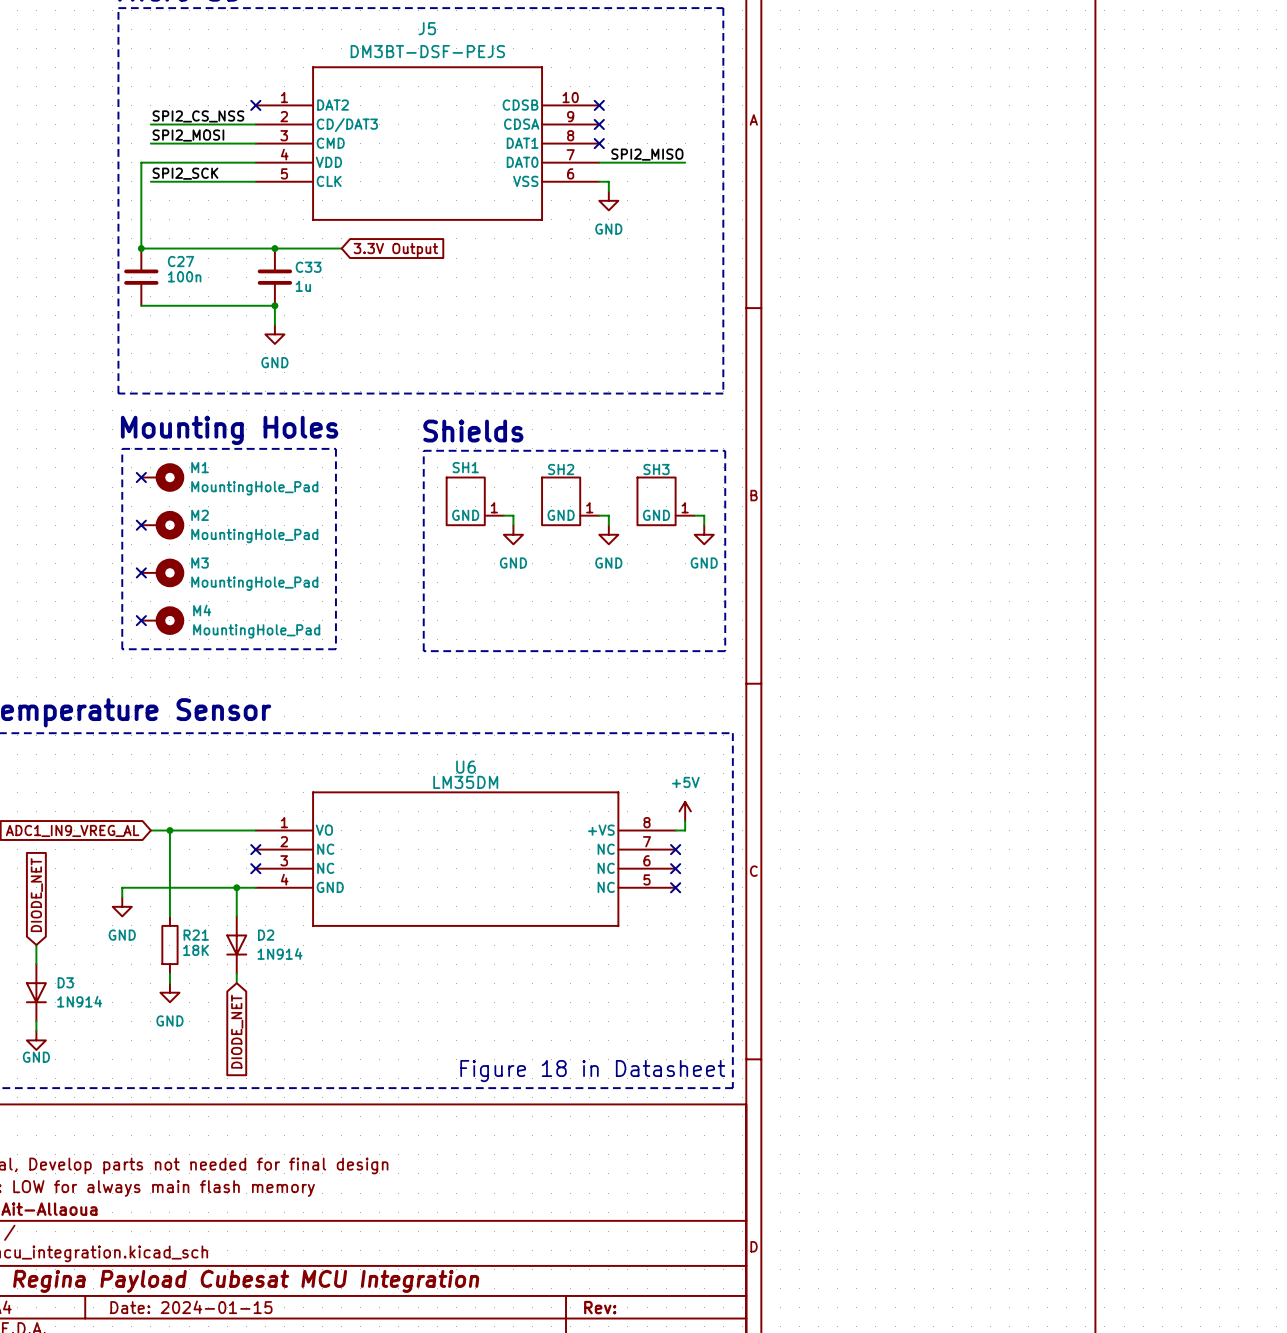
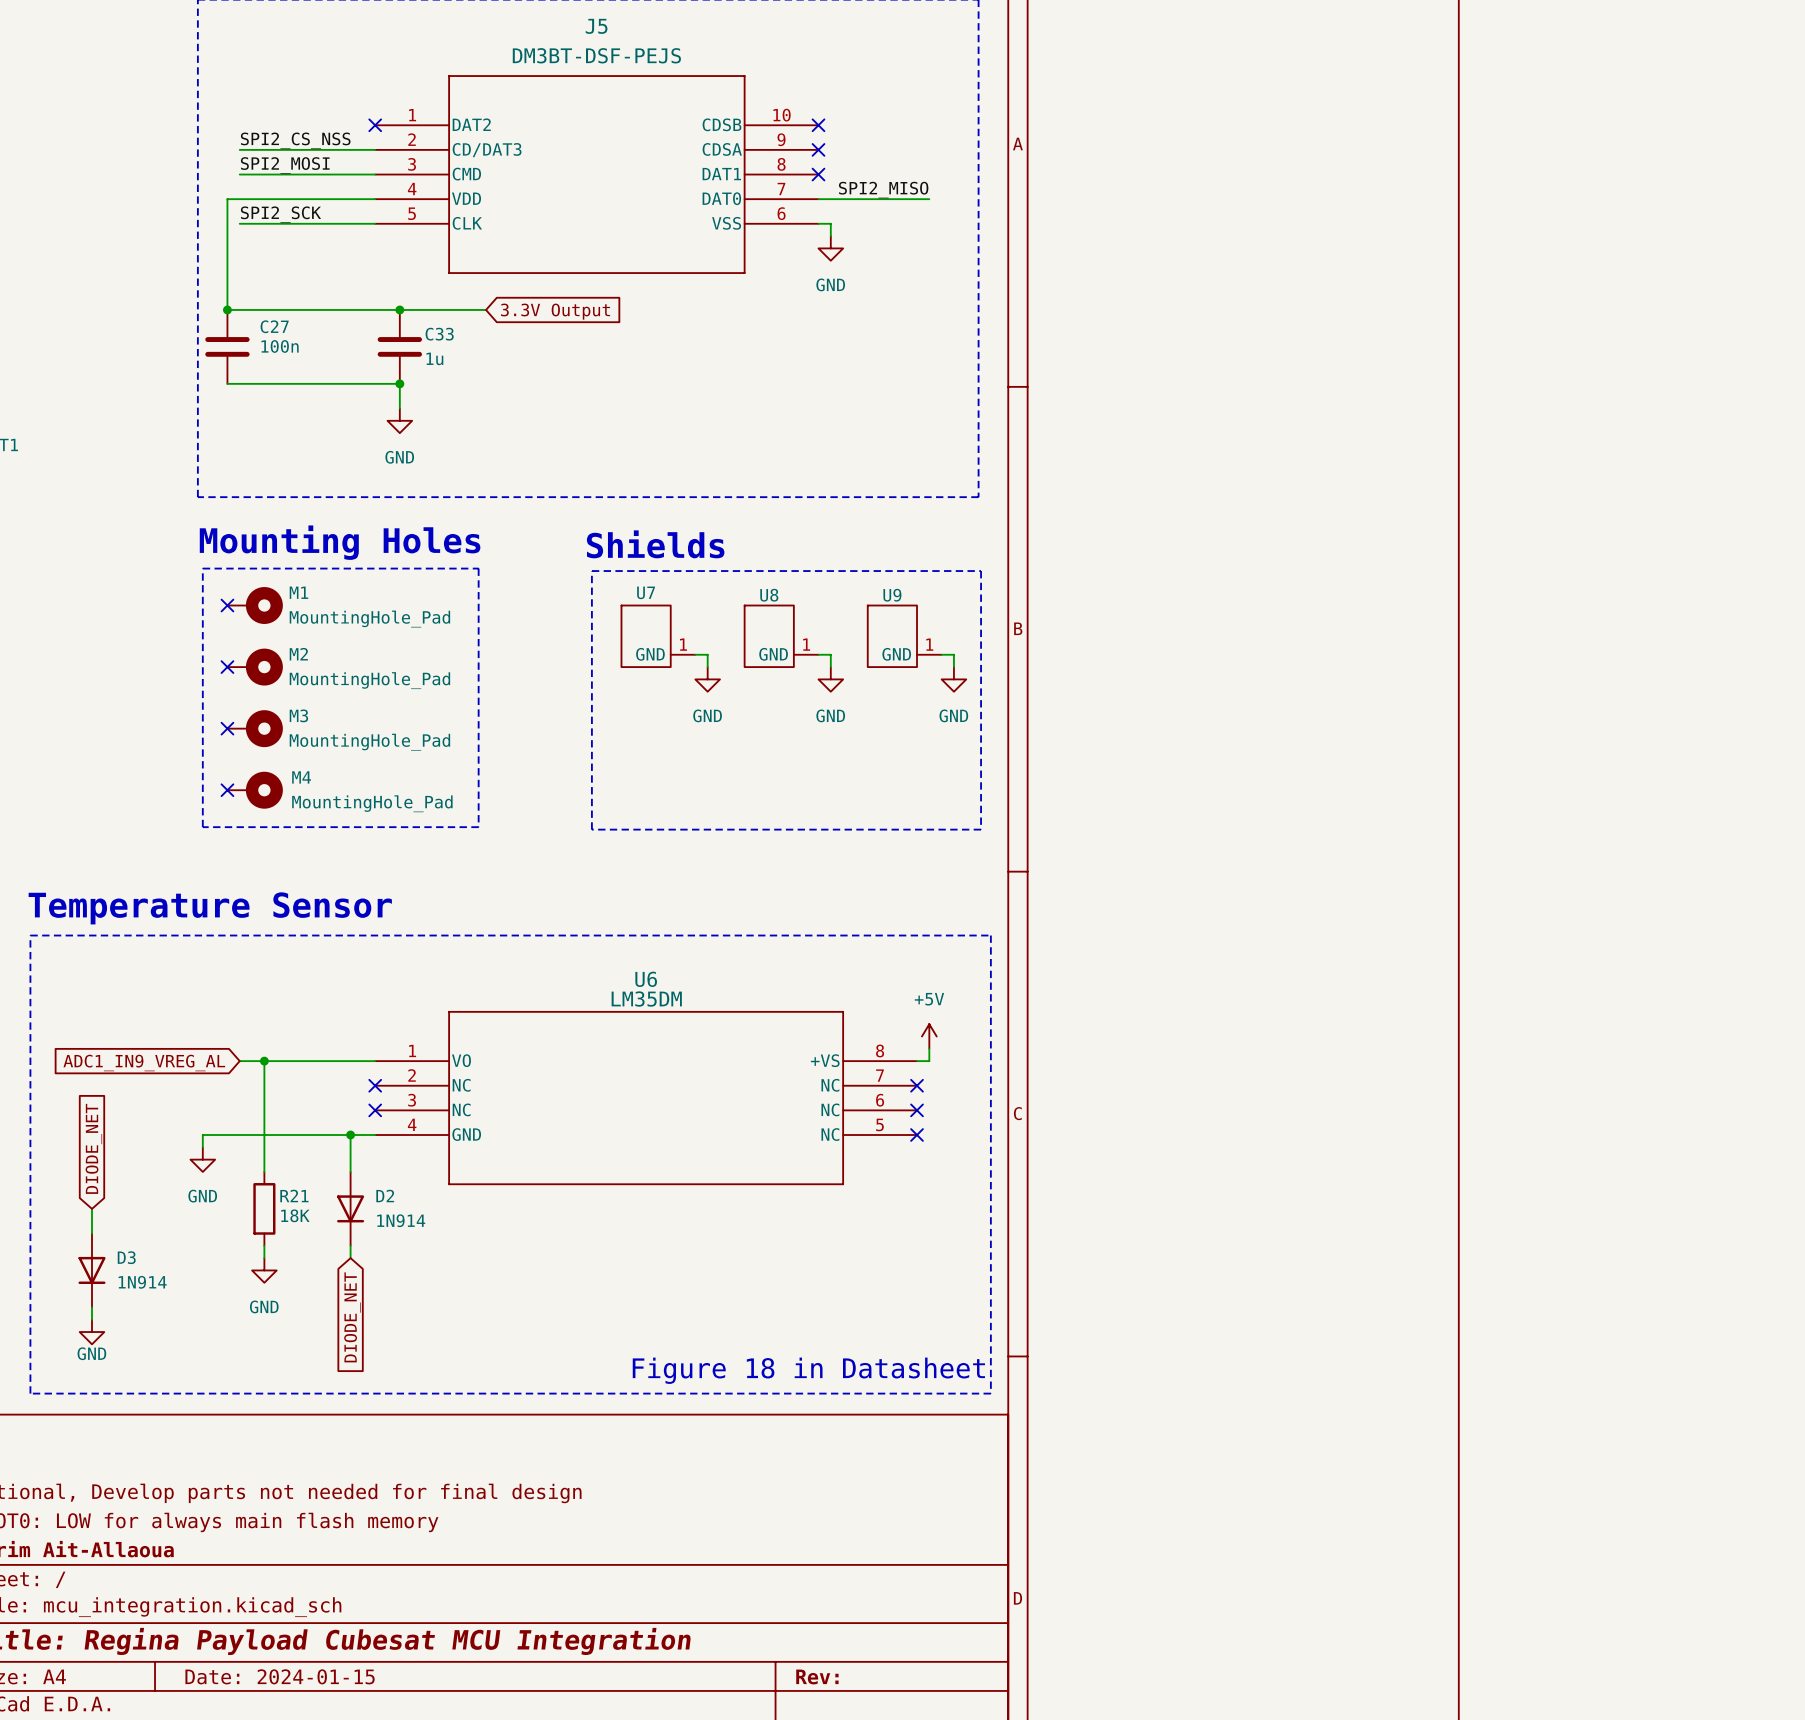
SH1 name: SH1 (465, 467) -> U7 (646, 592)
SH2 name: SH2 (561, 469) -> U8 (769, 595)
SH3 name: SH3 (656, 469) -> U9 (892, 595)

